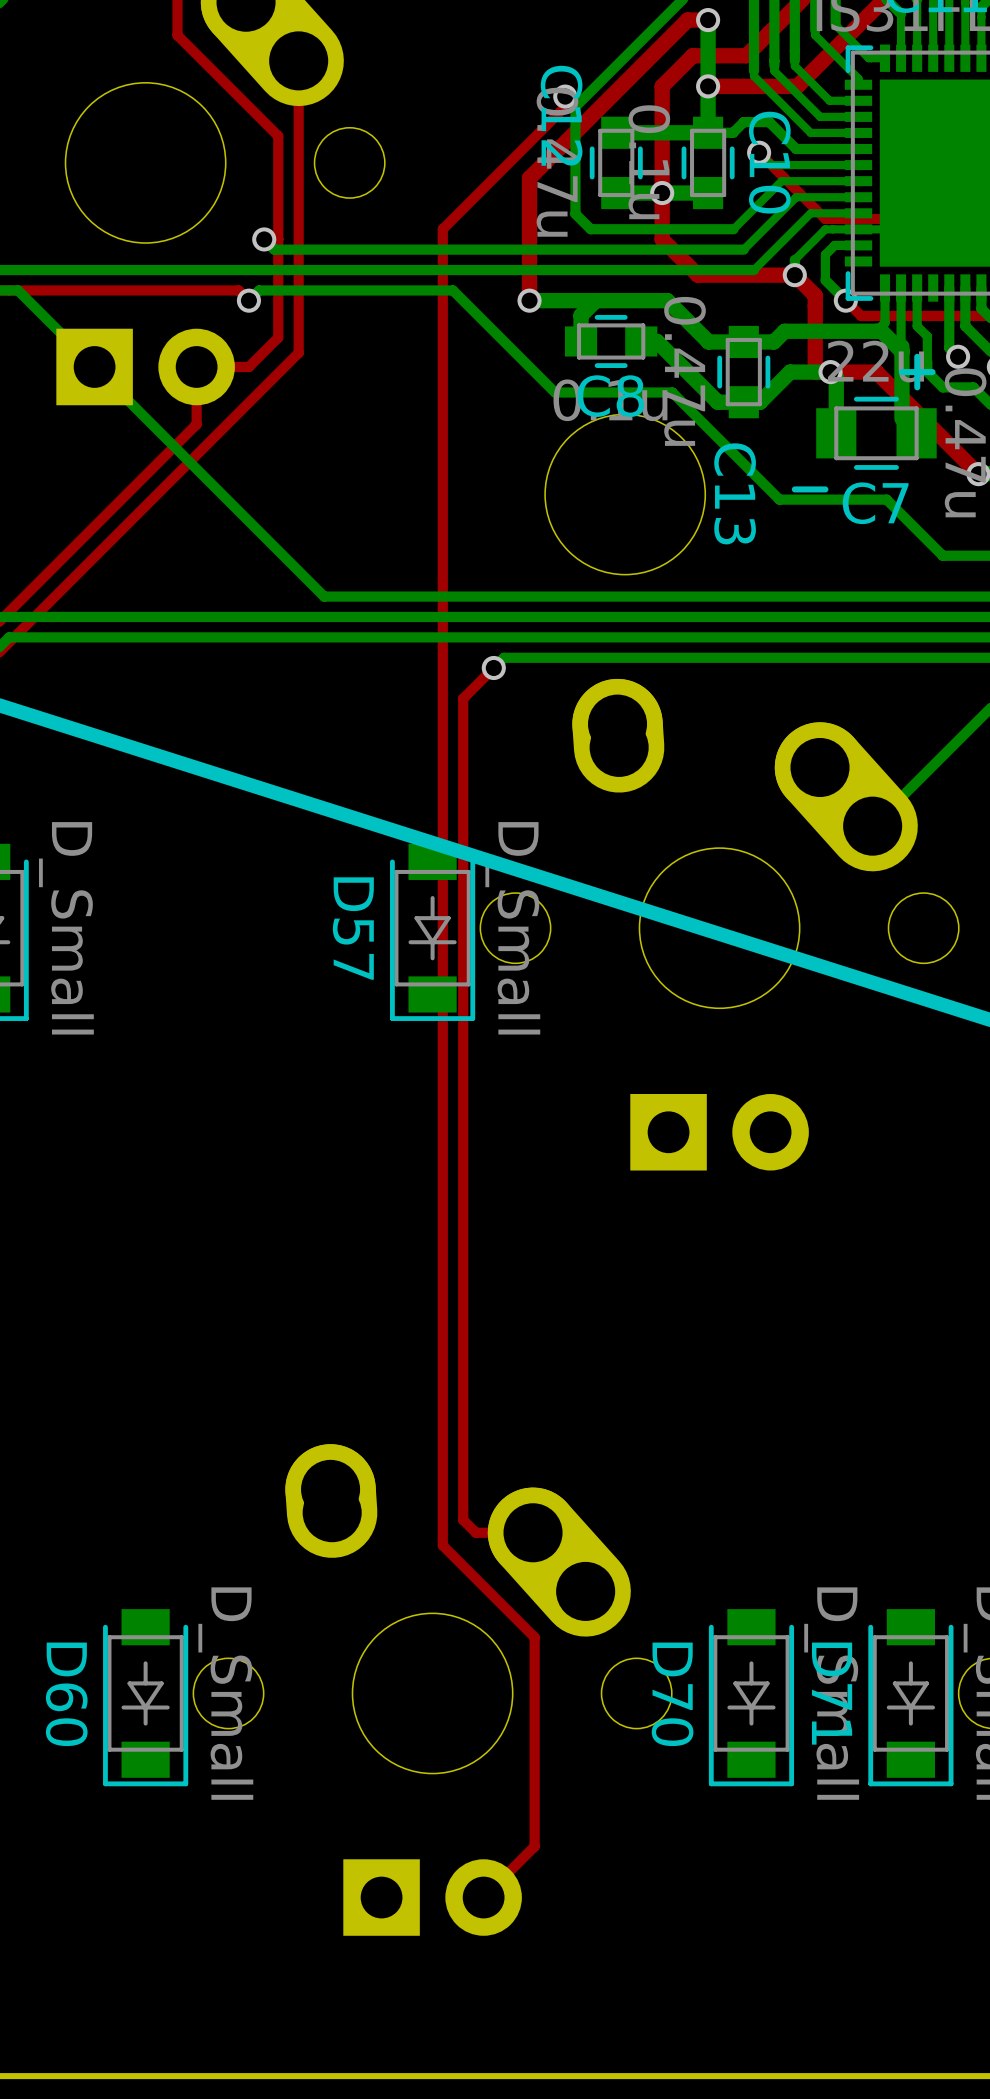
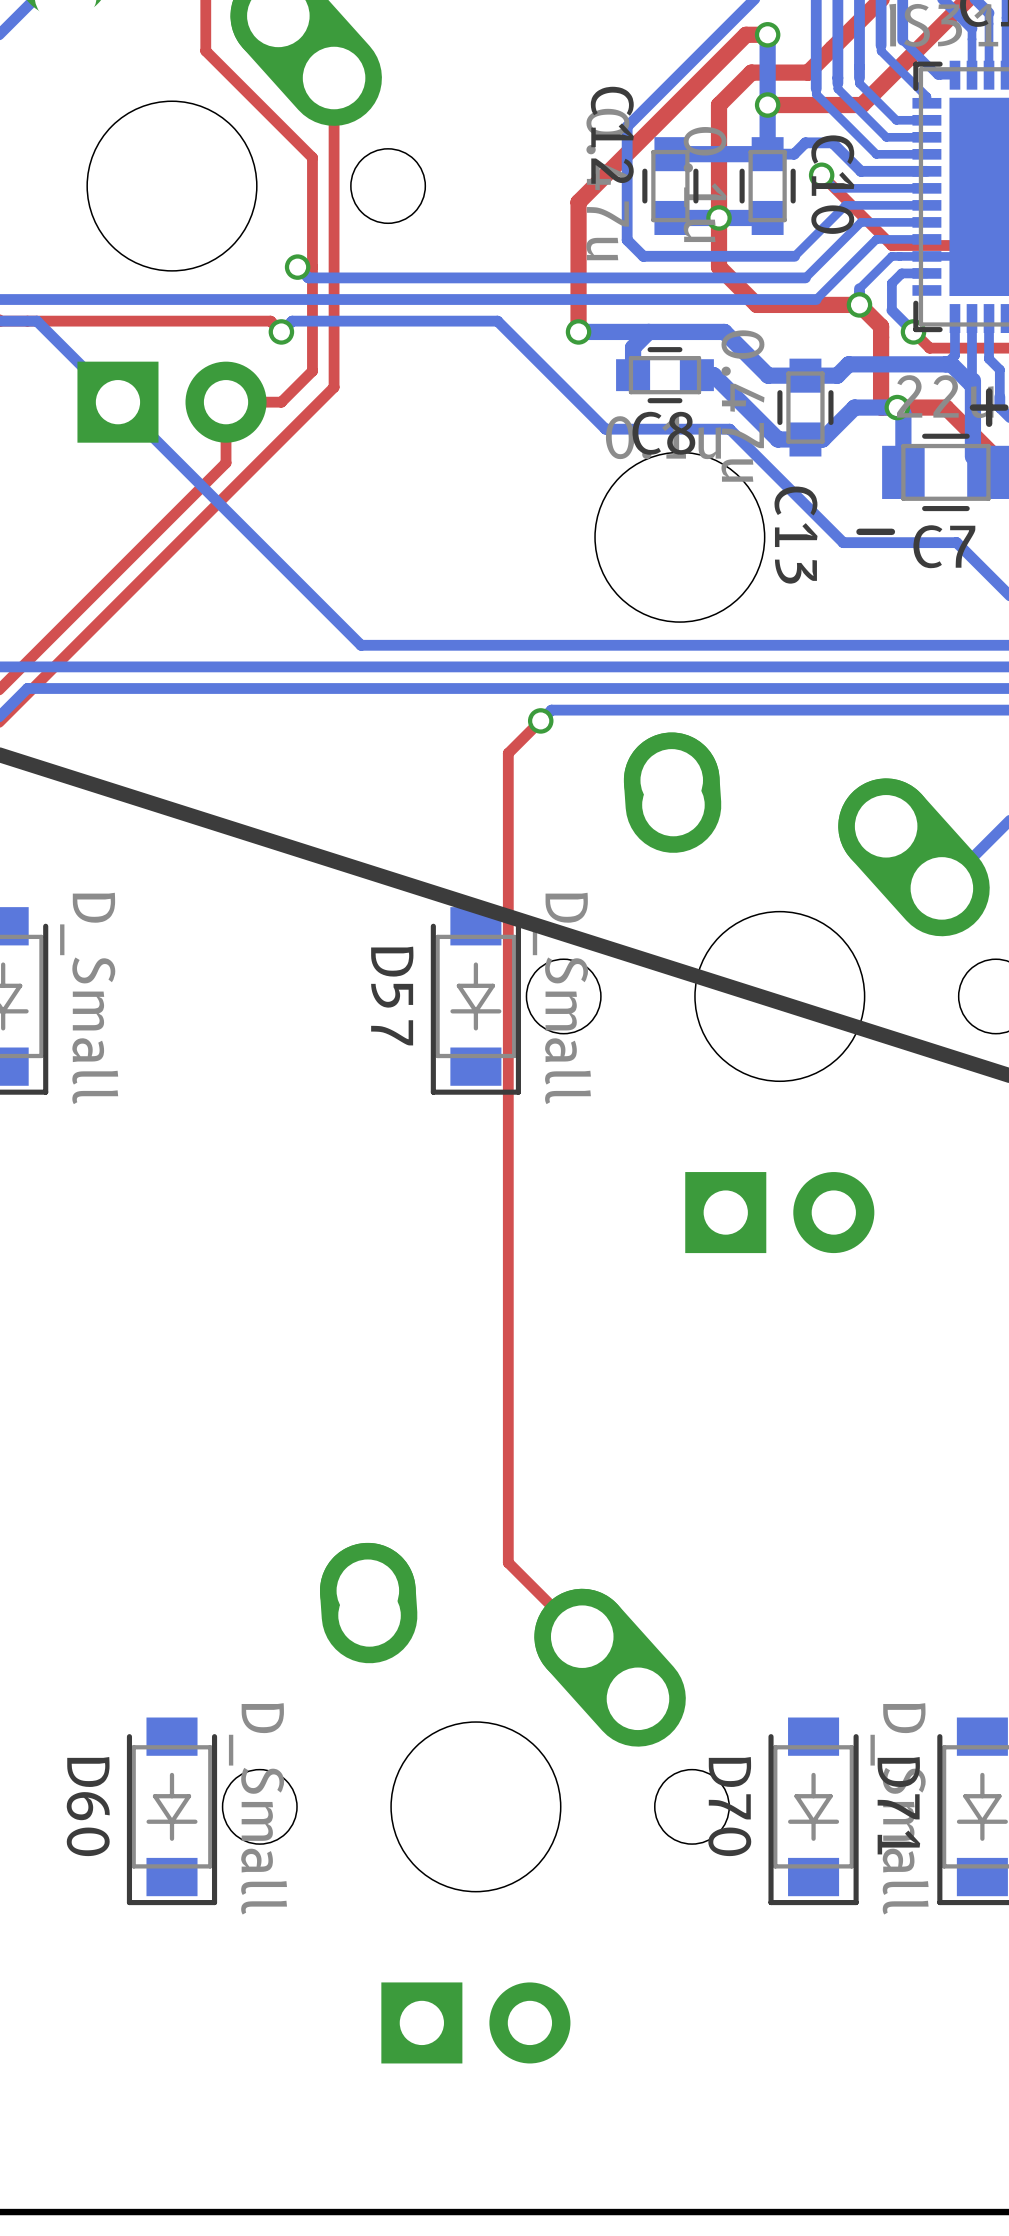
top track: (565, 96) (565, 106) (442, 229) (442, 1545) (534, 1637) (534, 1846) (483, 1897) -> none
via: (565, 96) -> none
top track: (463, 1462) (463, 1519) (475, 1532) (533, 1532) -> (508, 1562) (582, 1636)

